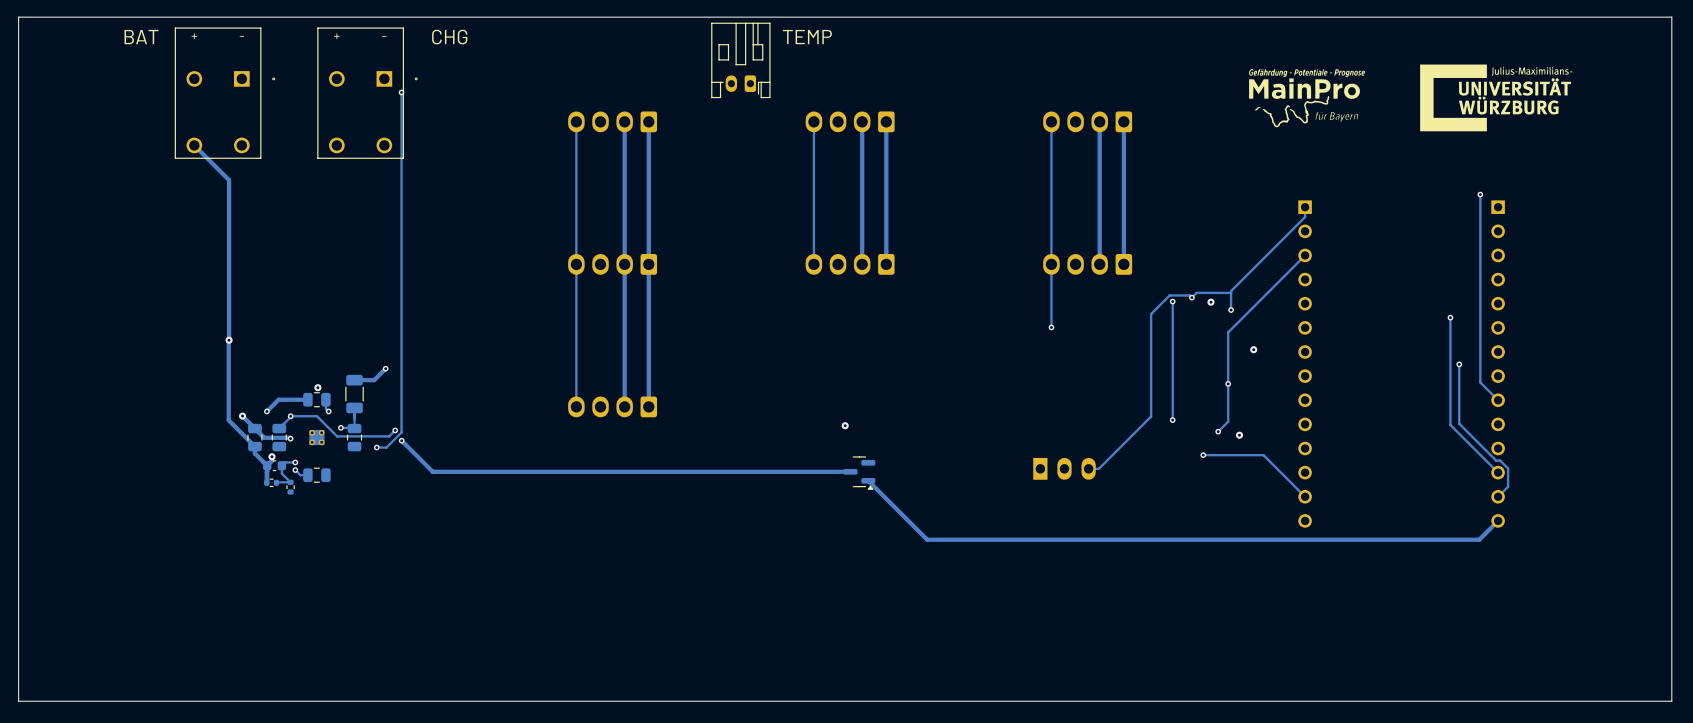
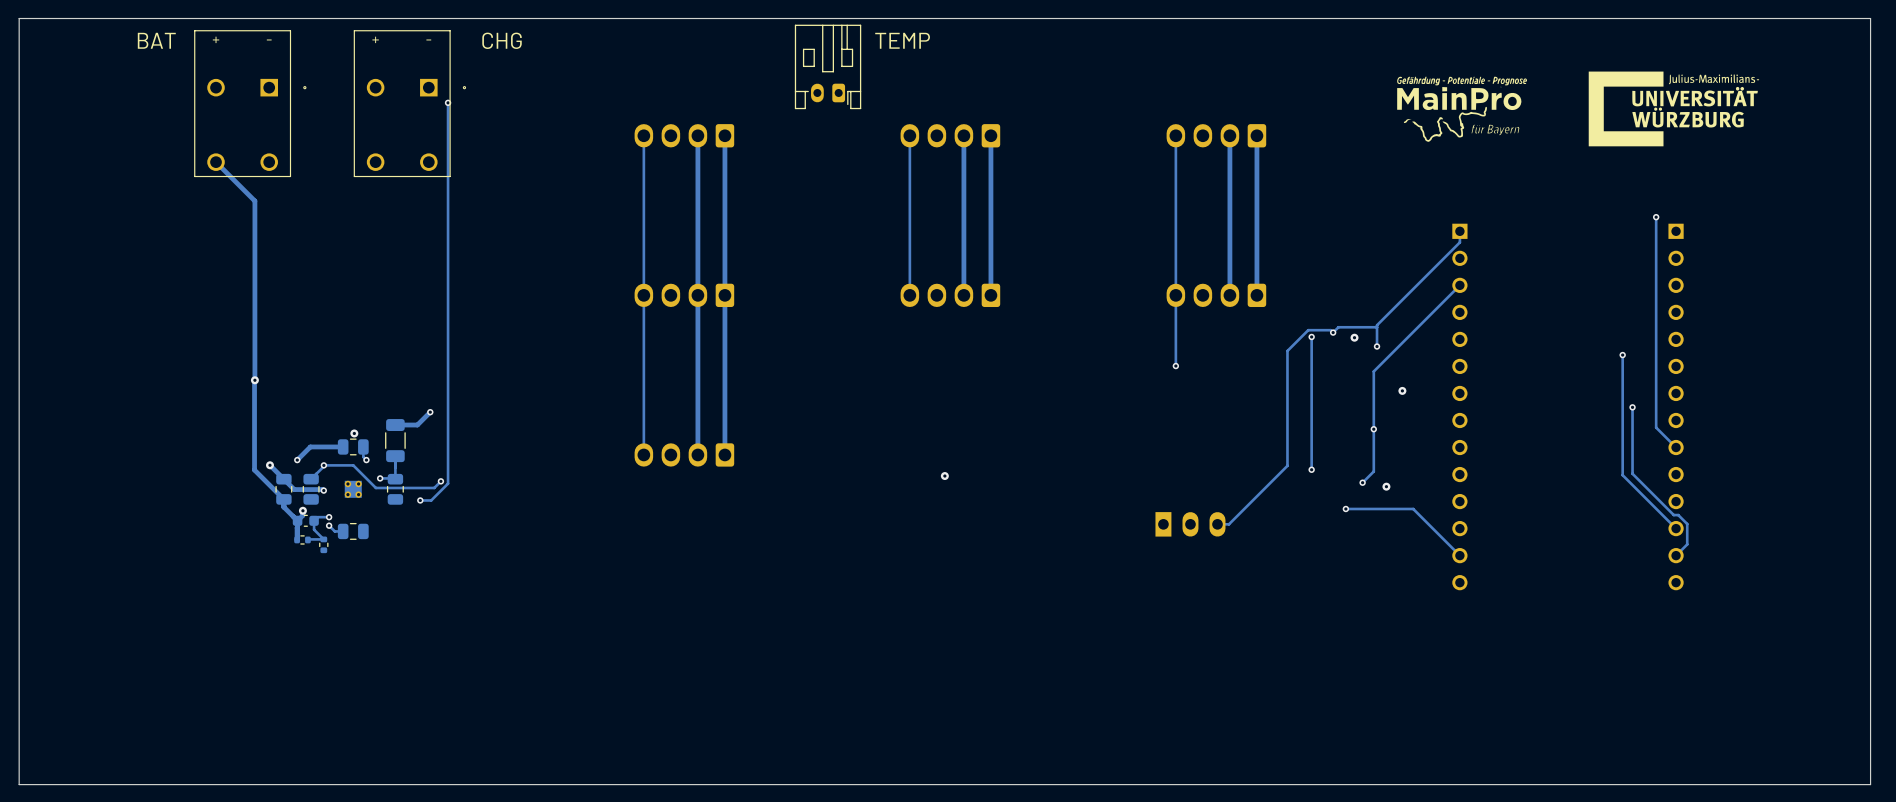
track: (401, 440) (432, 471) (850, 471) -> none
via: (401, 440) -> none
part: (859, 473) -> none
track: (868, 480) (927, 539) (1479, 539) (1498, 520) -> none

